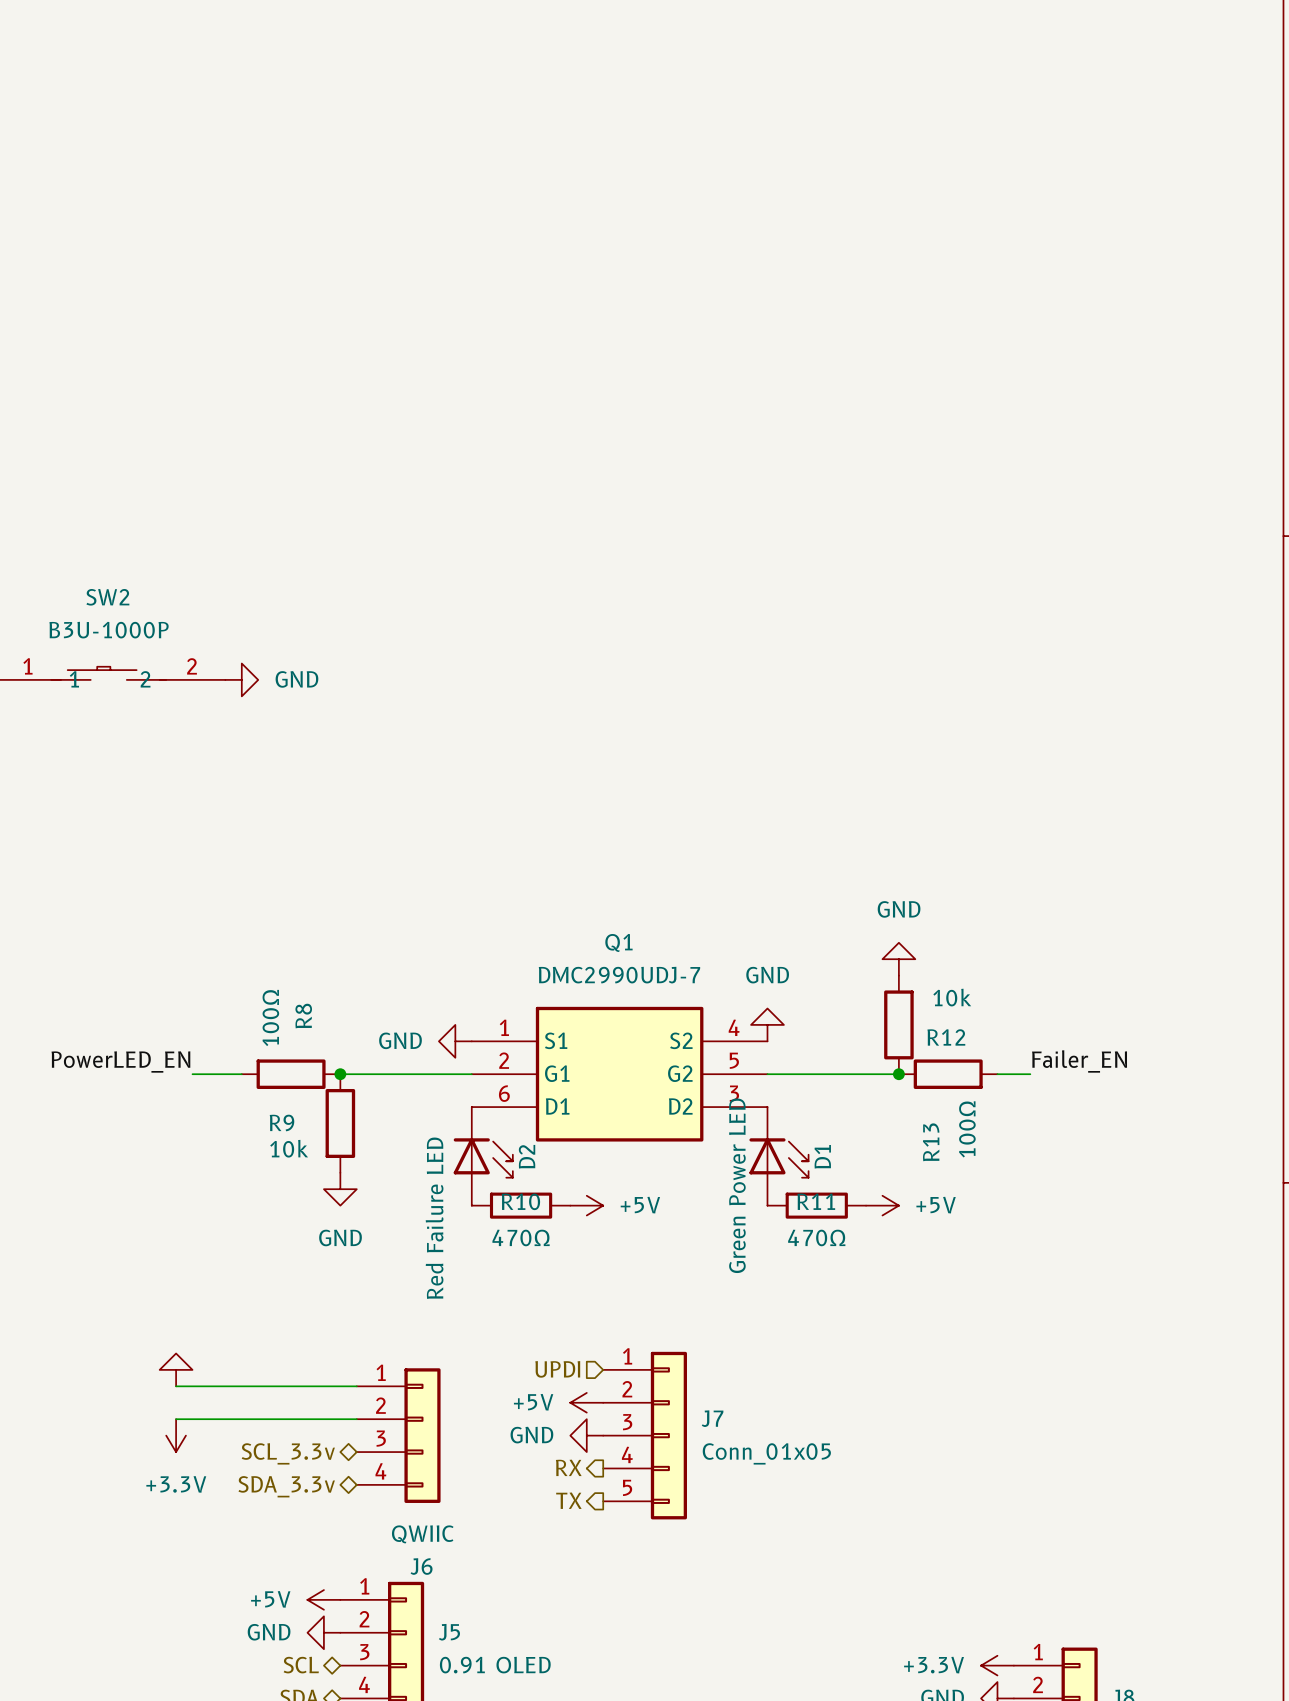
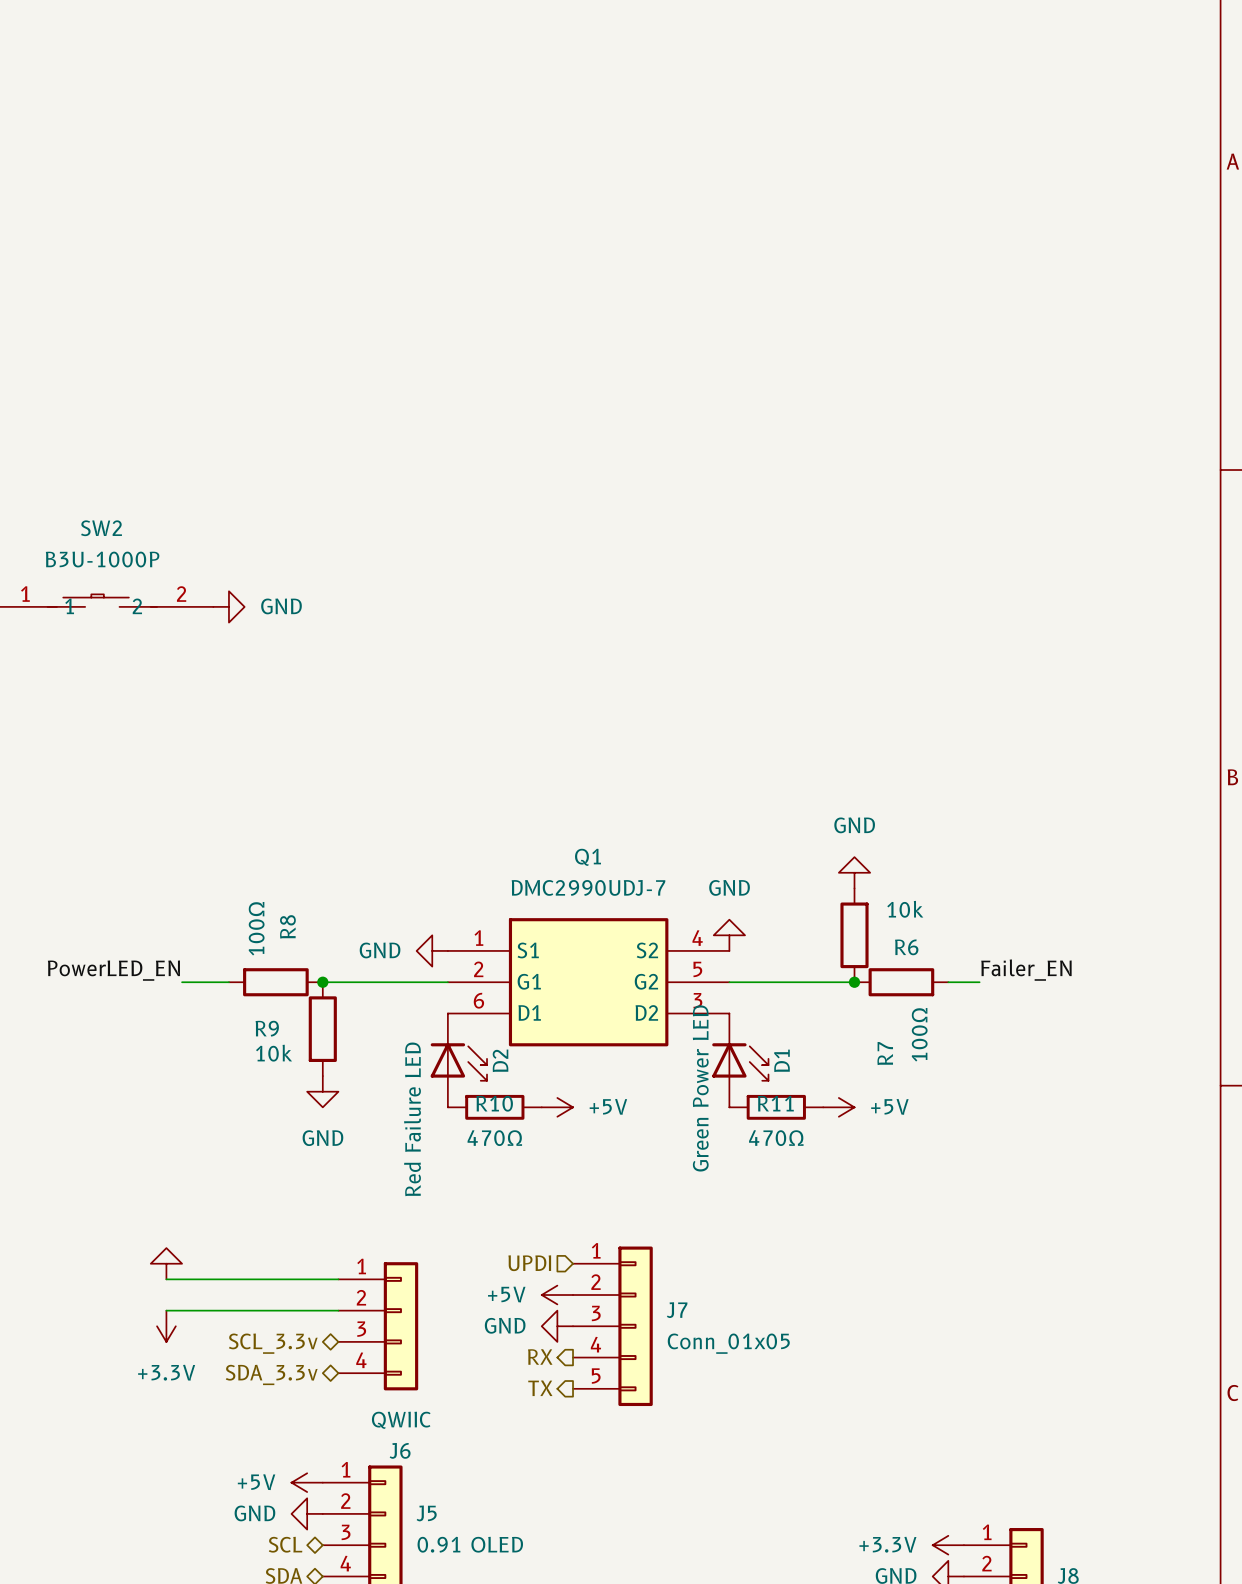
R12 name: R12 (946, 1037) -> R6 (906, 947)
R13 name: R13 (931, 1142) -> R7 (885, 1053)

